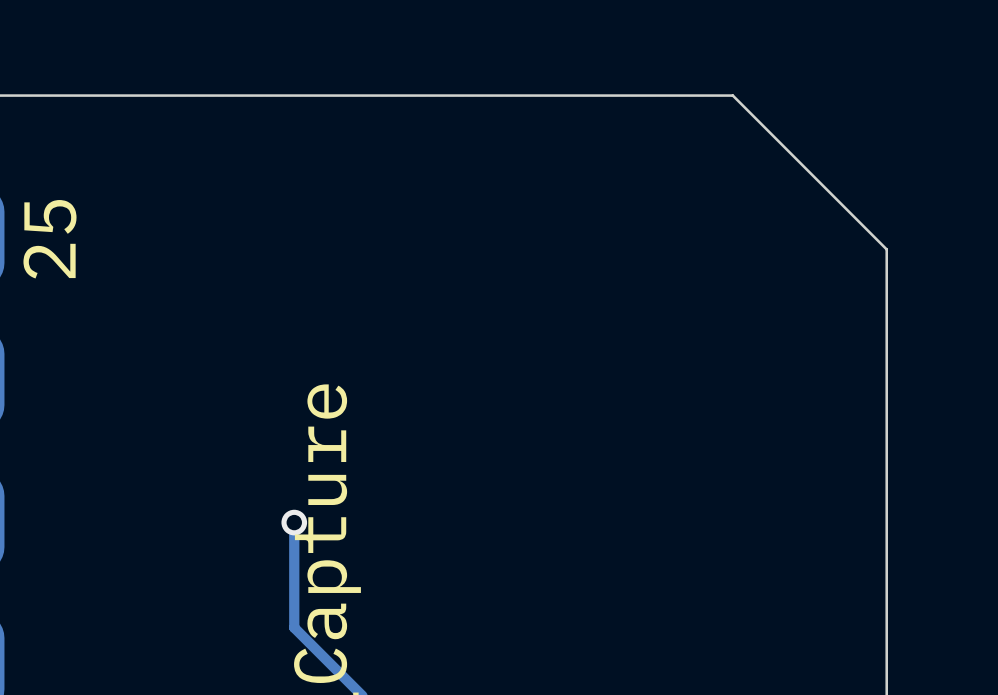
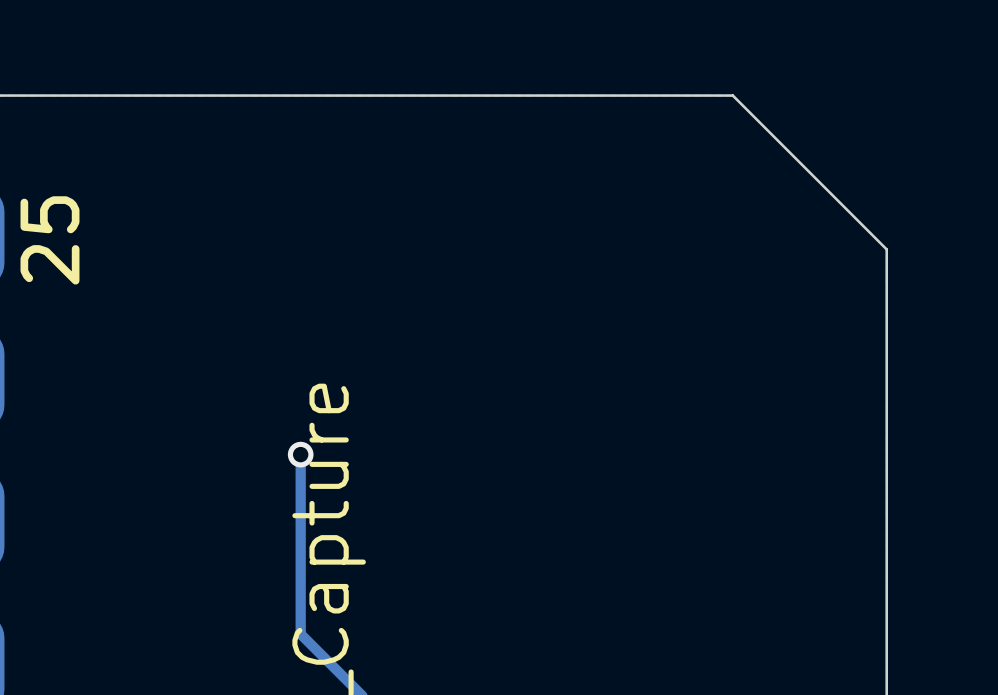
track: (294, 522) (294, 627) (300, 634) -> (300, 454) (300, 634)
via position: (294, 522) -> (300, 454)

